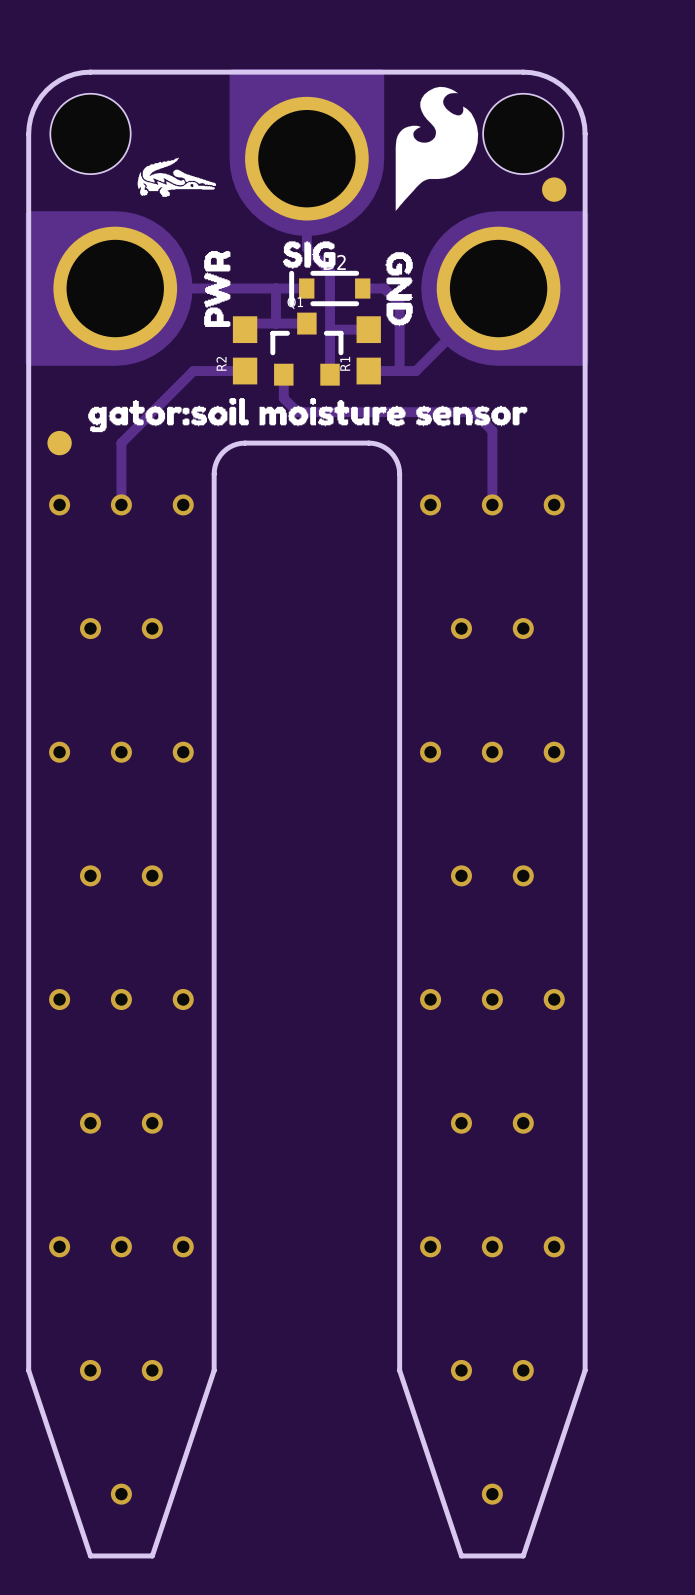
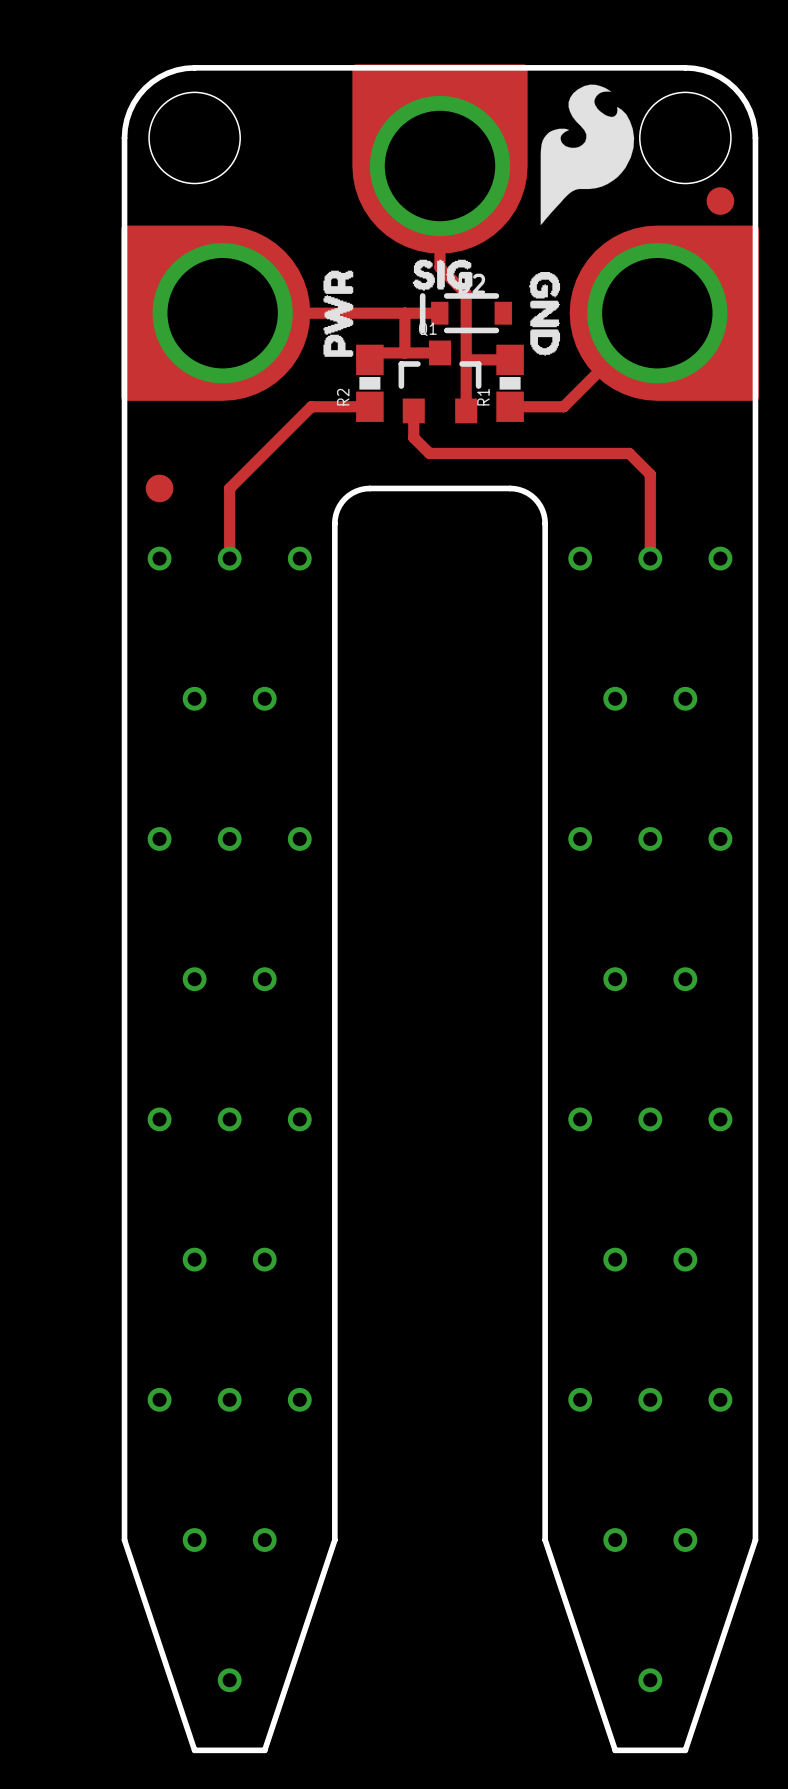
drawing: [137, 157, 217, 197] -> none
track: (362, 288) (384, 288) (399, 303) (399, 371) -> none
R2 footprint: [232, 316, 258, 385] -> [356, 344, 384, 422]
R1 footprint: [356, 316, 381, 385] -> [496, 344, 524, 422]
drawing: [88, 398, 528, 433] -> none

